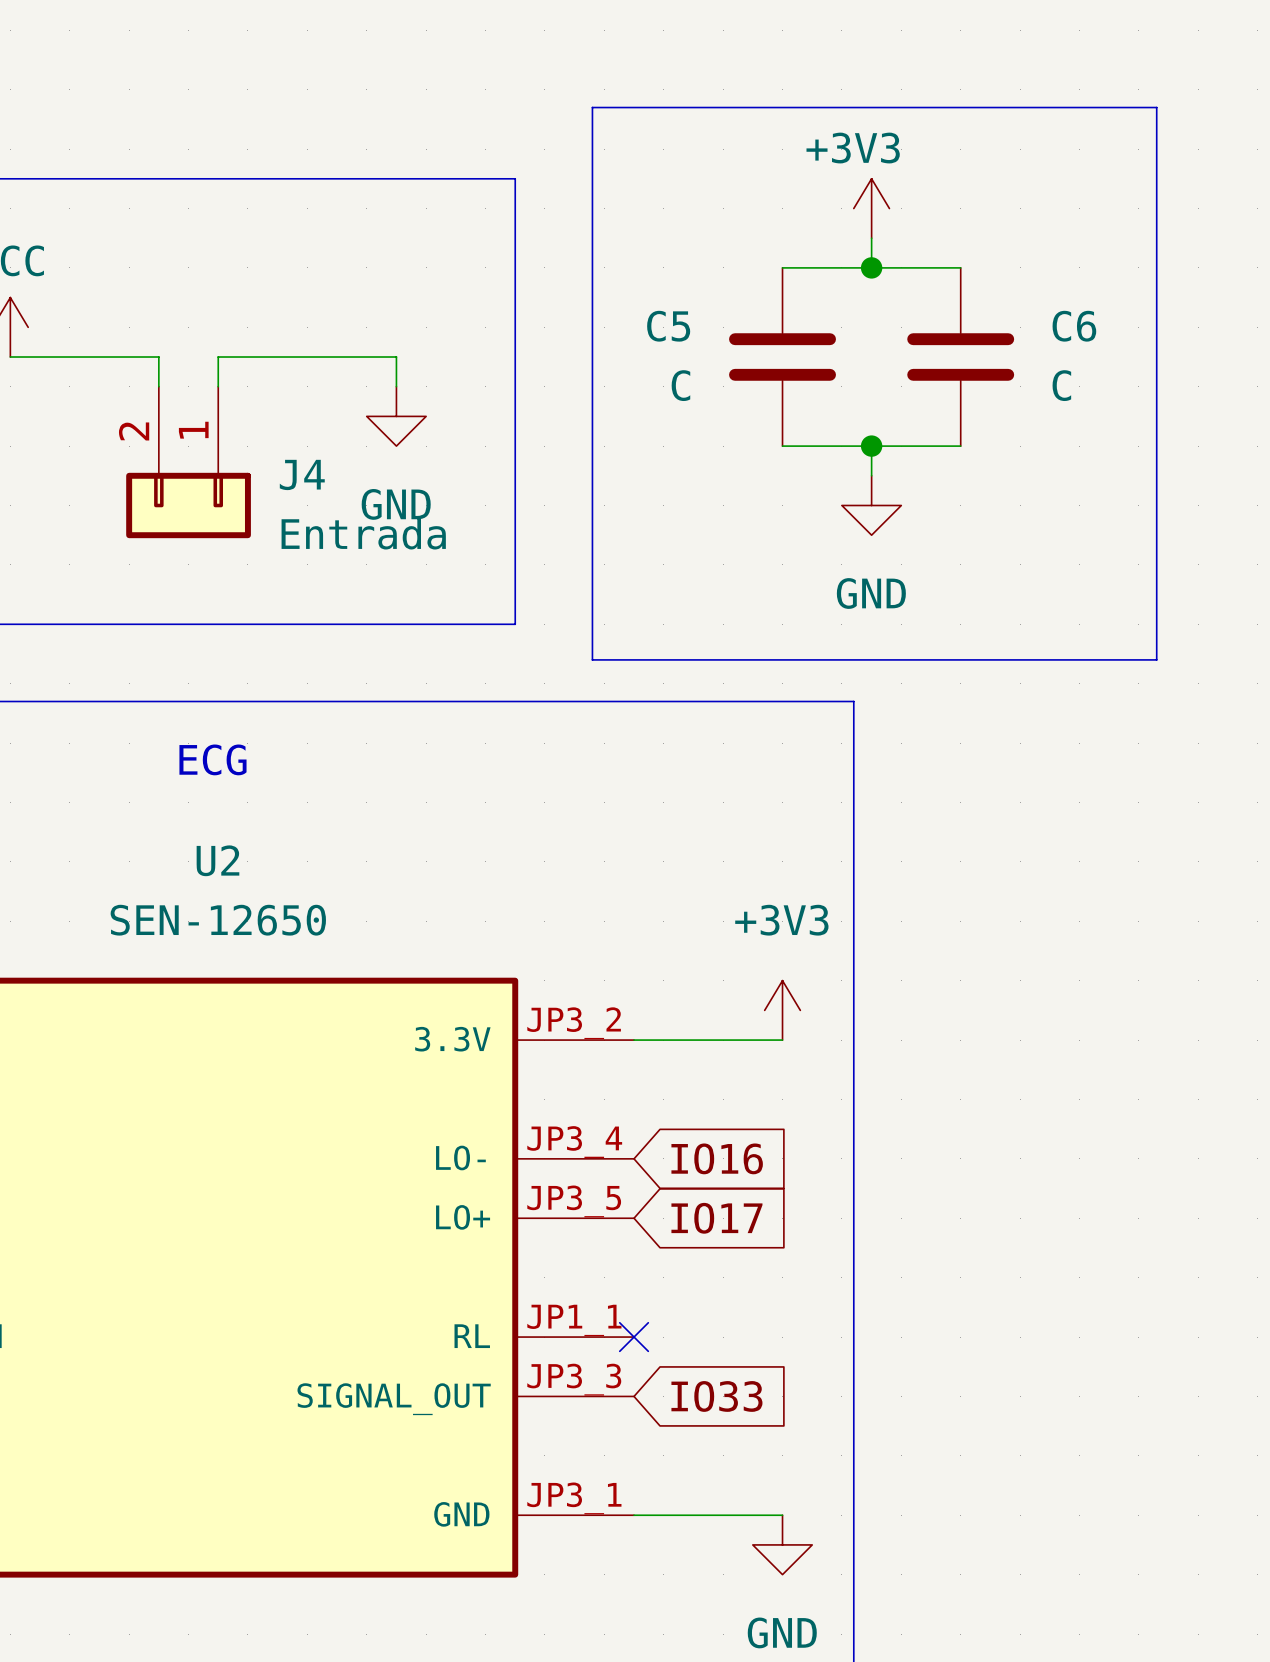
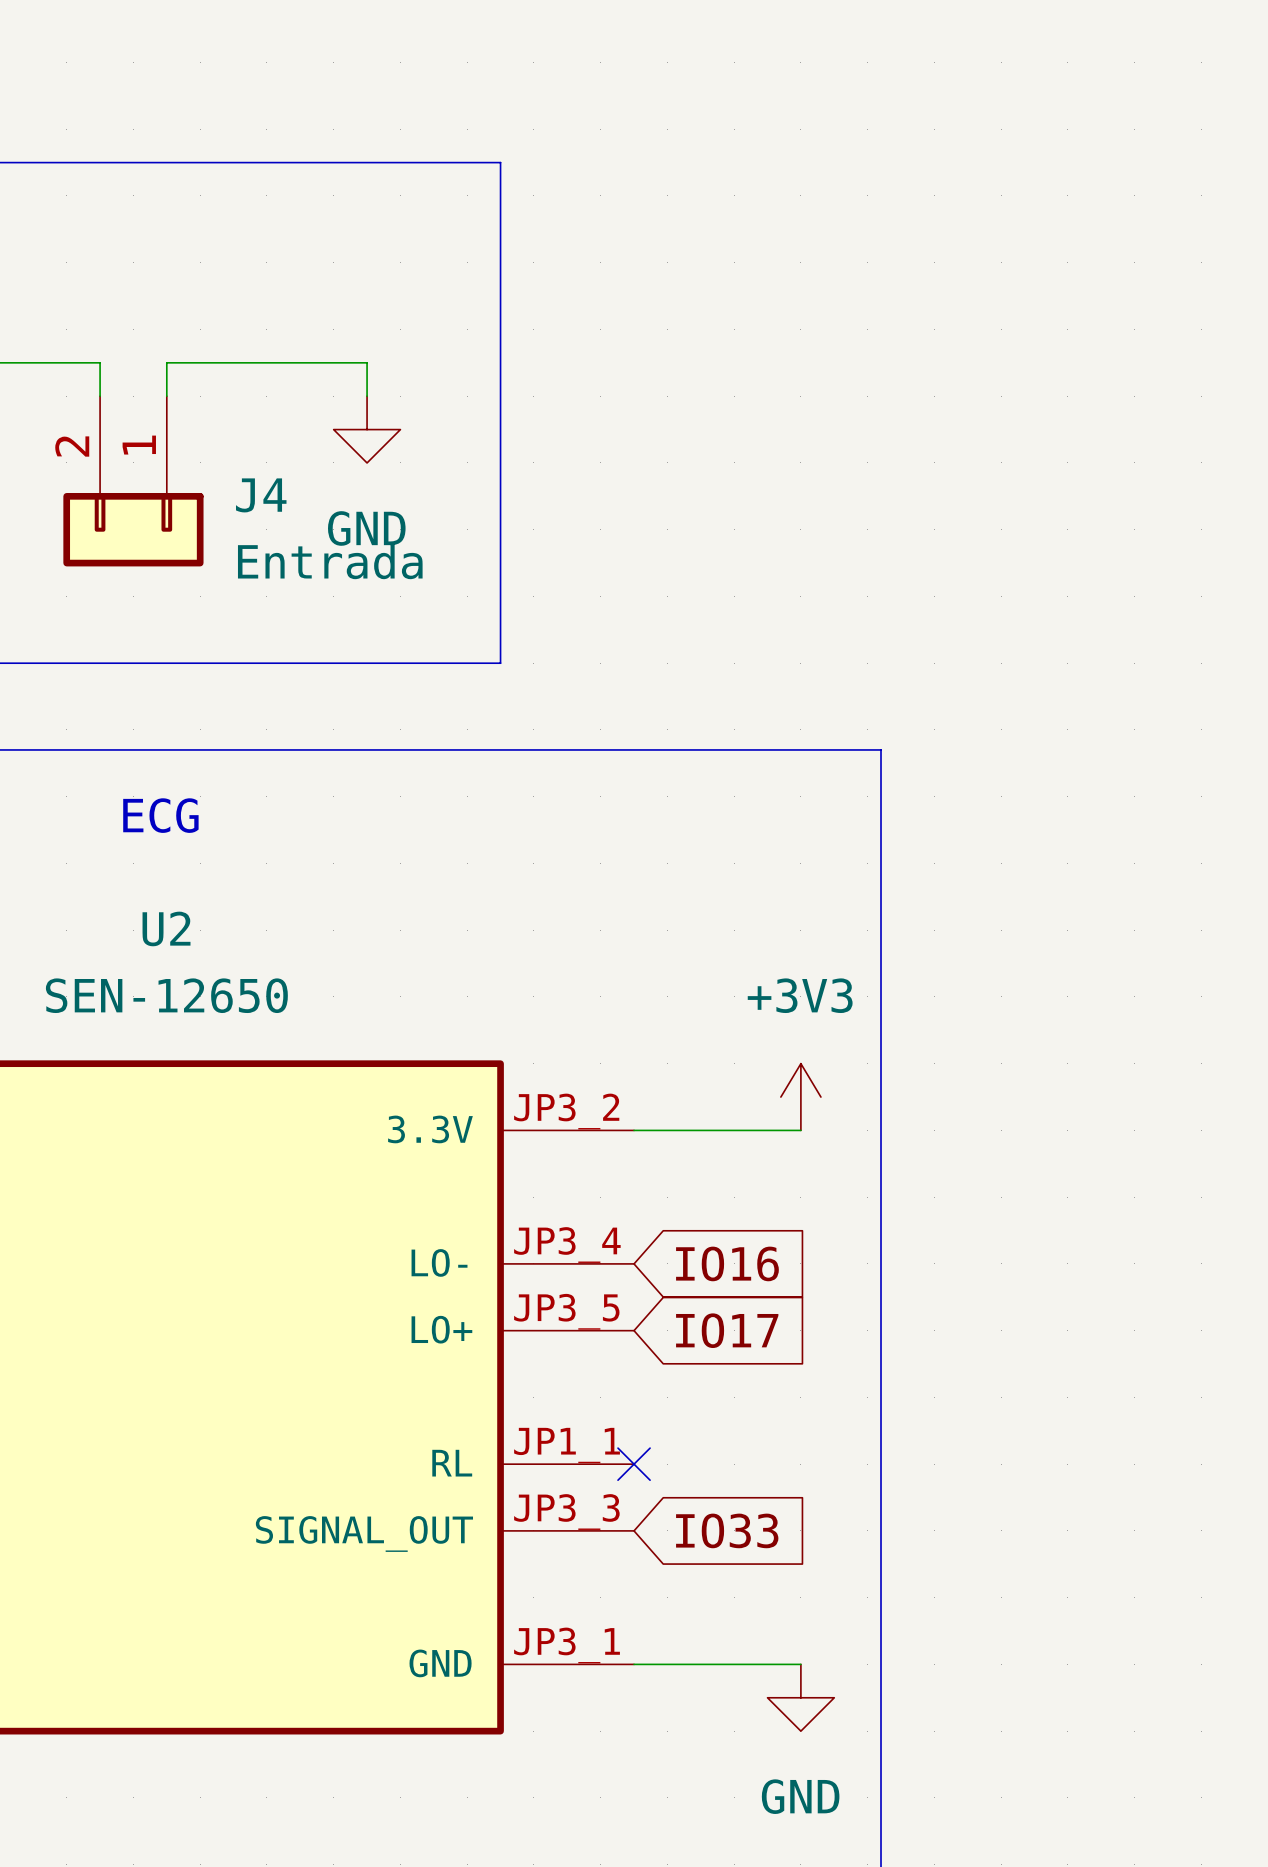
line: (592, 107) (1156, 107) (1156, 659) (592, 659) (592, 107) -> none
power symbol: +3V3 (871, 208) -> none
wire: (871, 238) (871, 267) -> none
wire: (782, 267) (960, 267) -> none
junction: (871, 267) -> none
C5: C (782, 357) -> none
C6: C (960, 357) -> none
wire: (782, 446) (960, 446) -> none
wire: (871, 446) (871, 475) -> none
junction: (871, 446) -> none
power symbol: GND (871, 505) -> none

